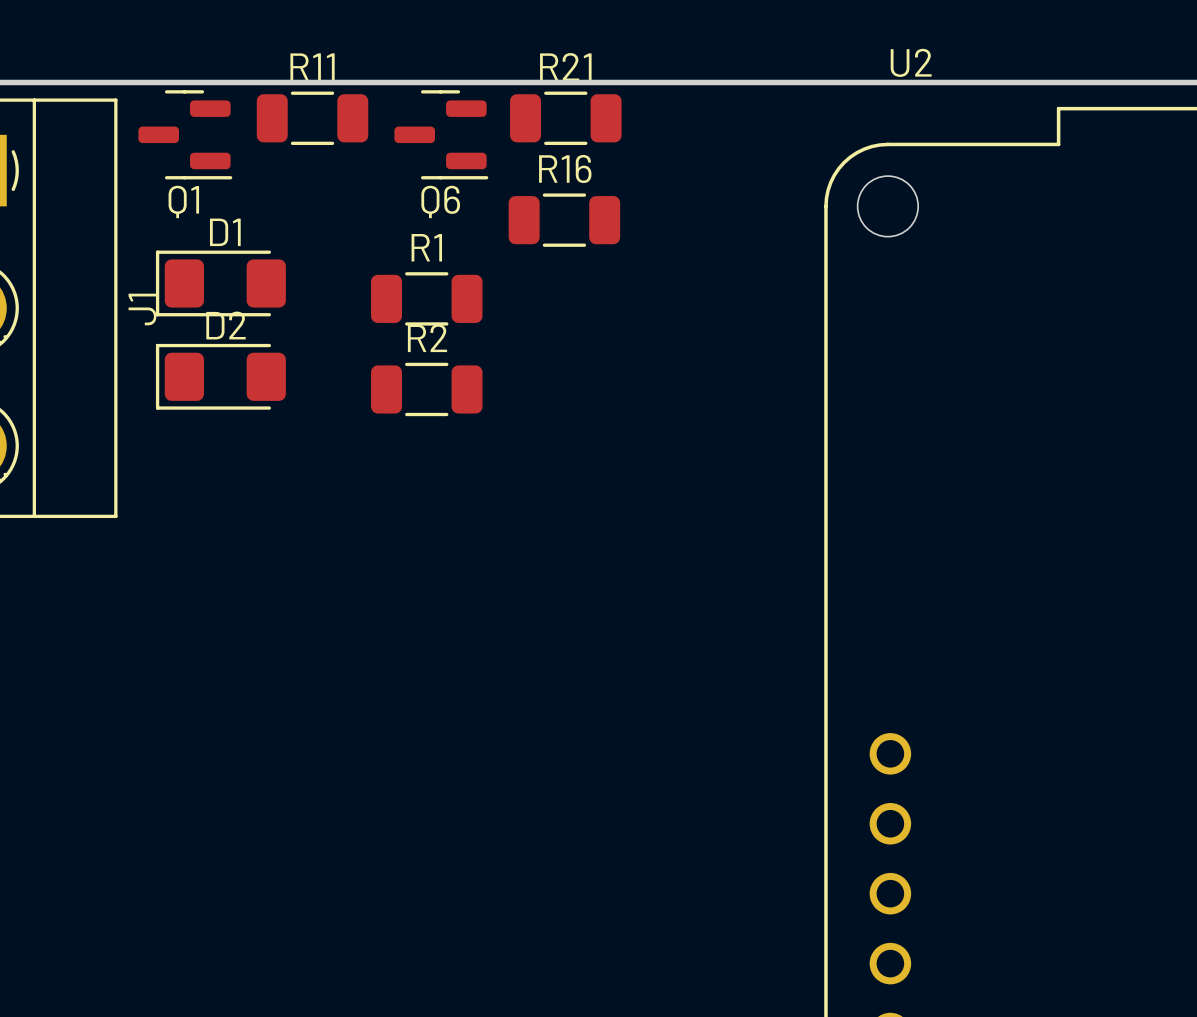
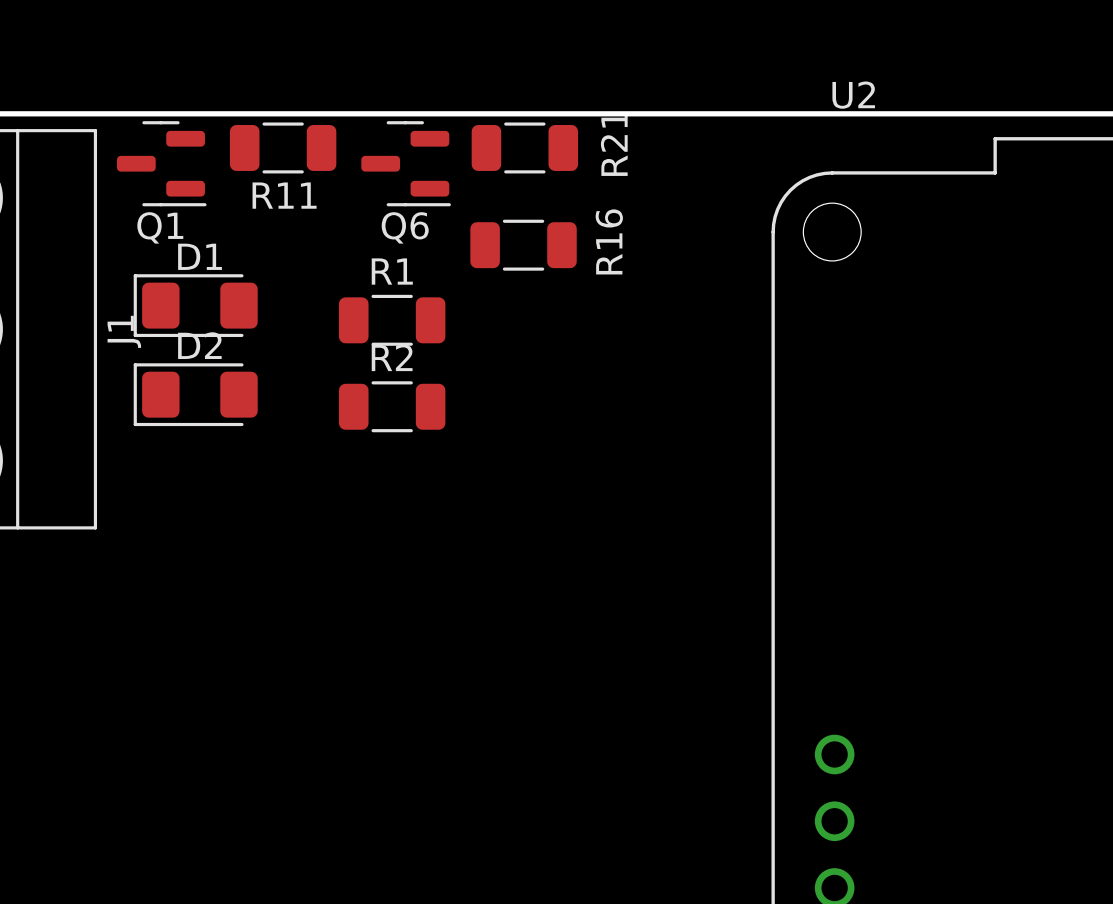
R21 name rotation: 0° (565, 66) -> 90° counterclockwise (614, 143)
R21 name position: R21 (565, 66) -> R21 (614, 143)
R11 name position: R11 (312, 67) -> R11 (284, 195)
R16 name rotation: 0° (565, 168) -> 90° counterclockwise (609, 241)
R16 name position: R16 (565, 168) -> R16 (609, 241)

